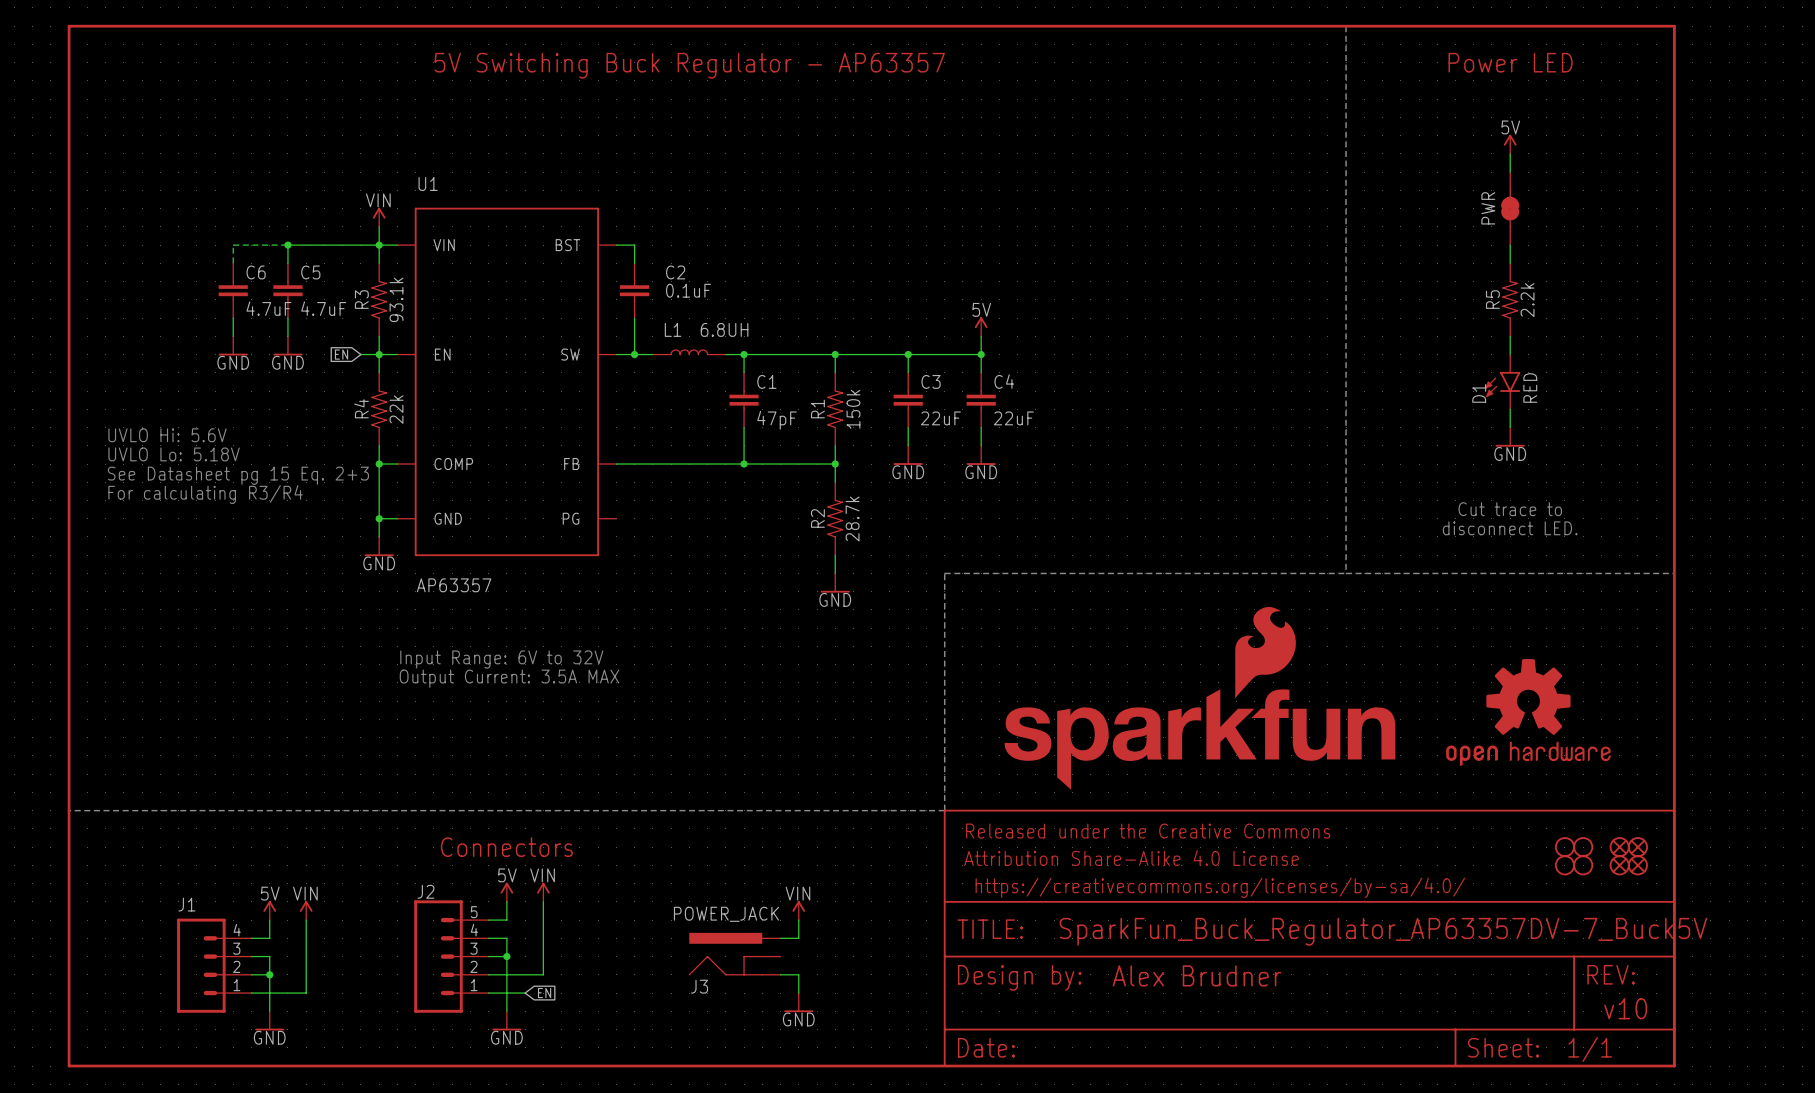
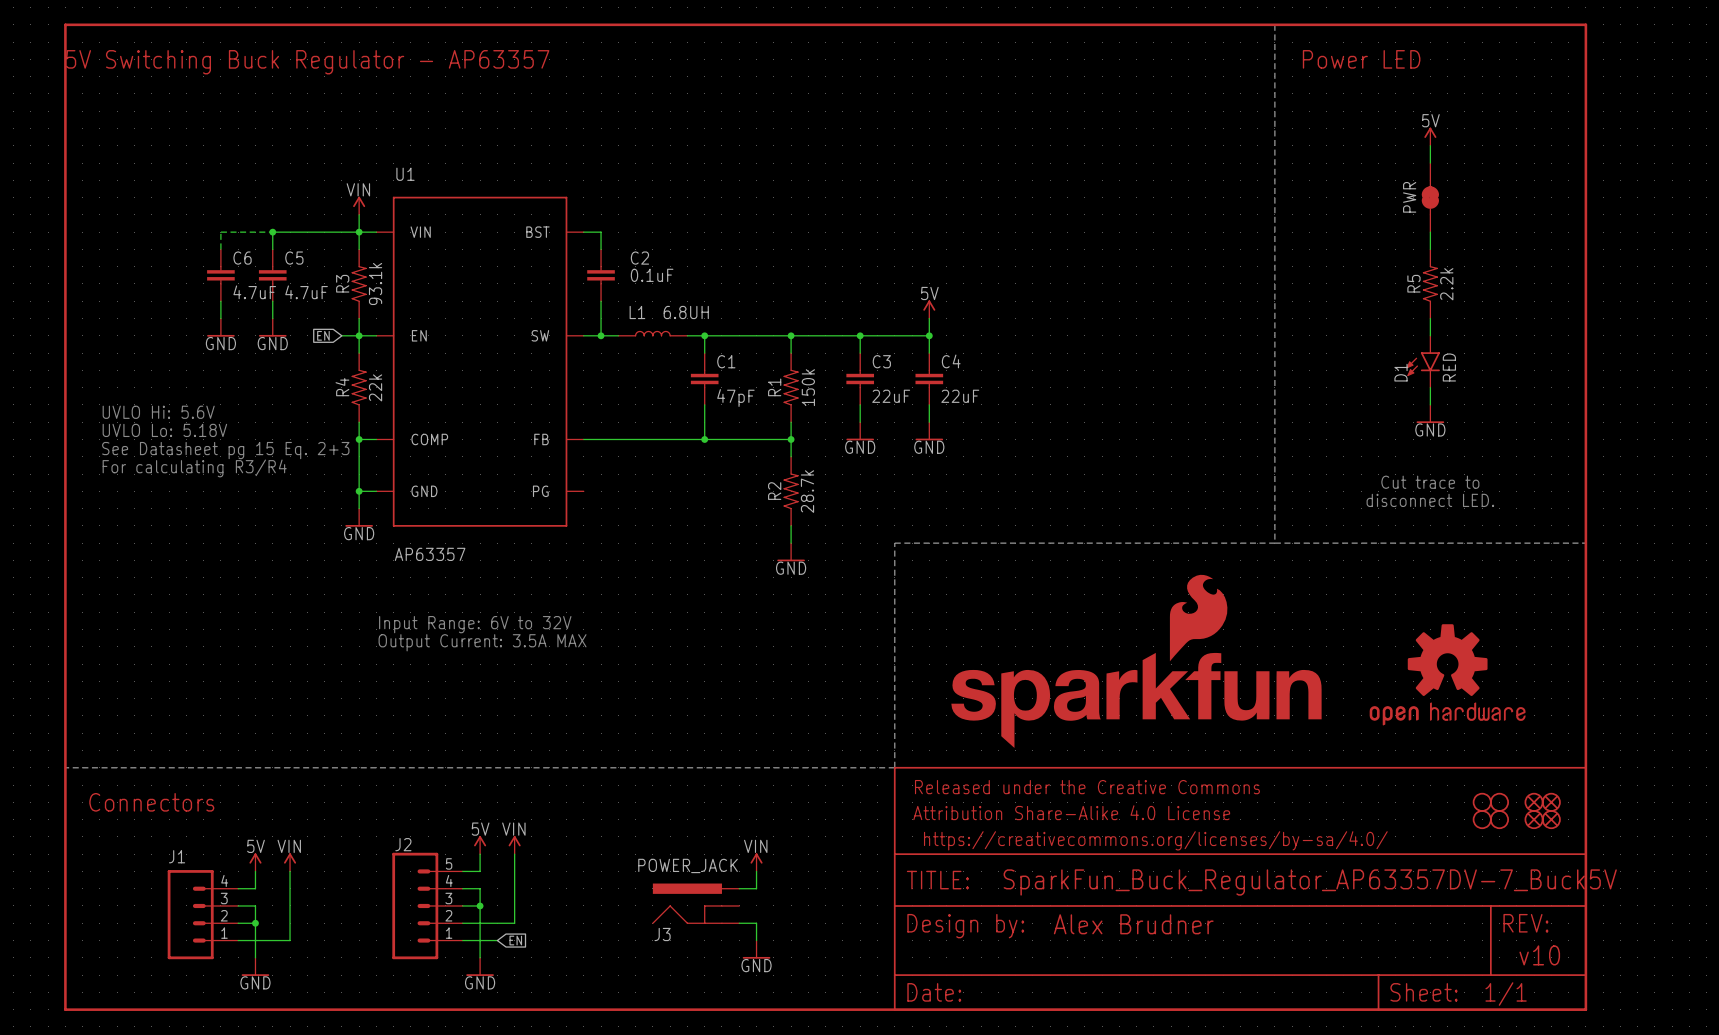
text position: Power LED (1510, 62) -> Power LED (1361, 59)
text: none -> 5V Switching Buck Regulator - AP63357 (307, 62)
text: 5V Switching Buck Regulator - AP63357 (689, 65) -> none
text: none -> Connectors (151, 802)
text: Connectors (506, 847) -> none

